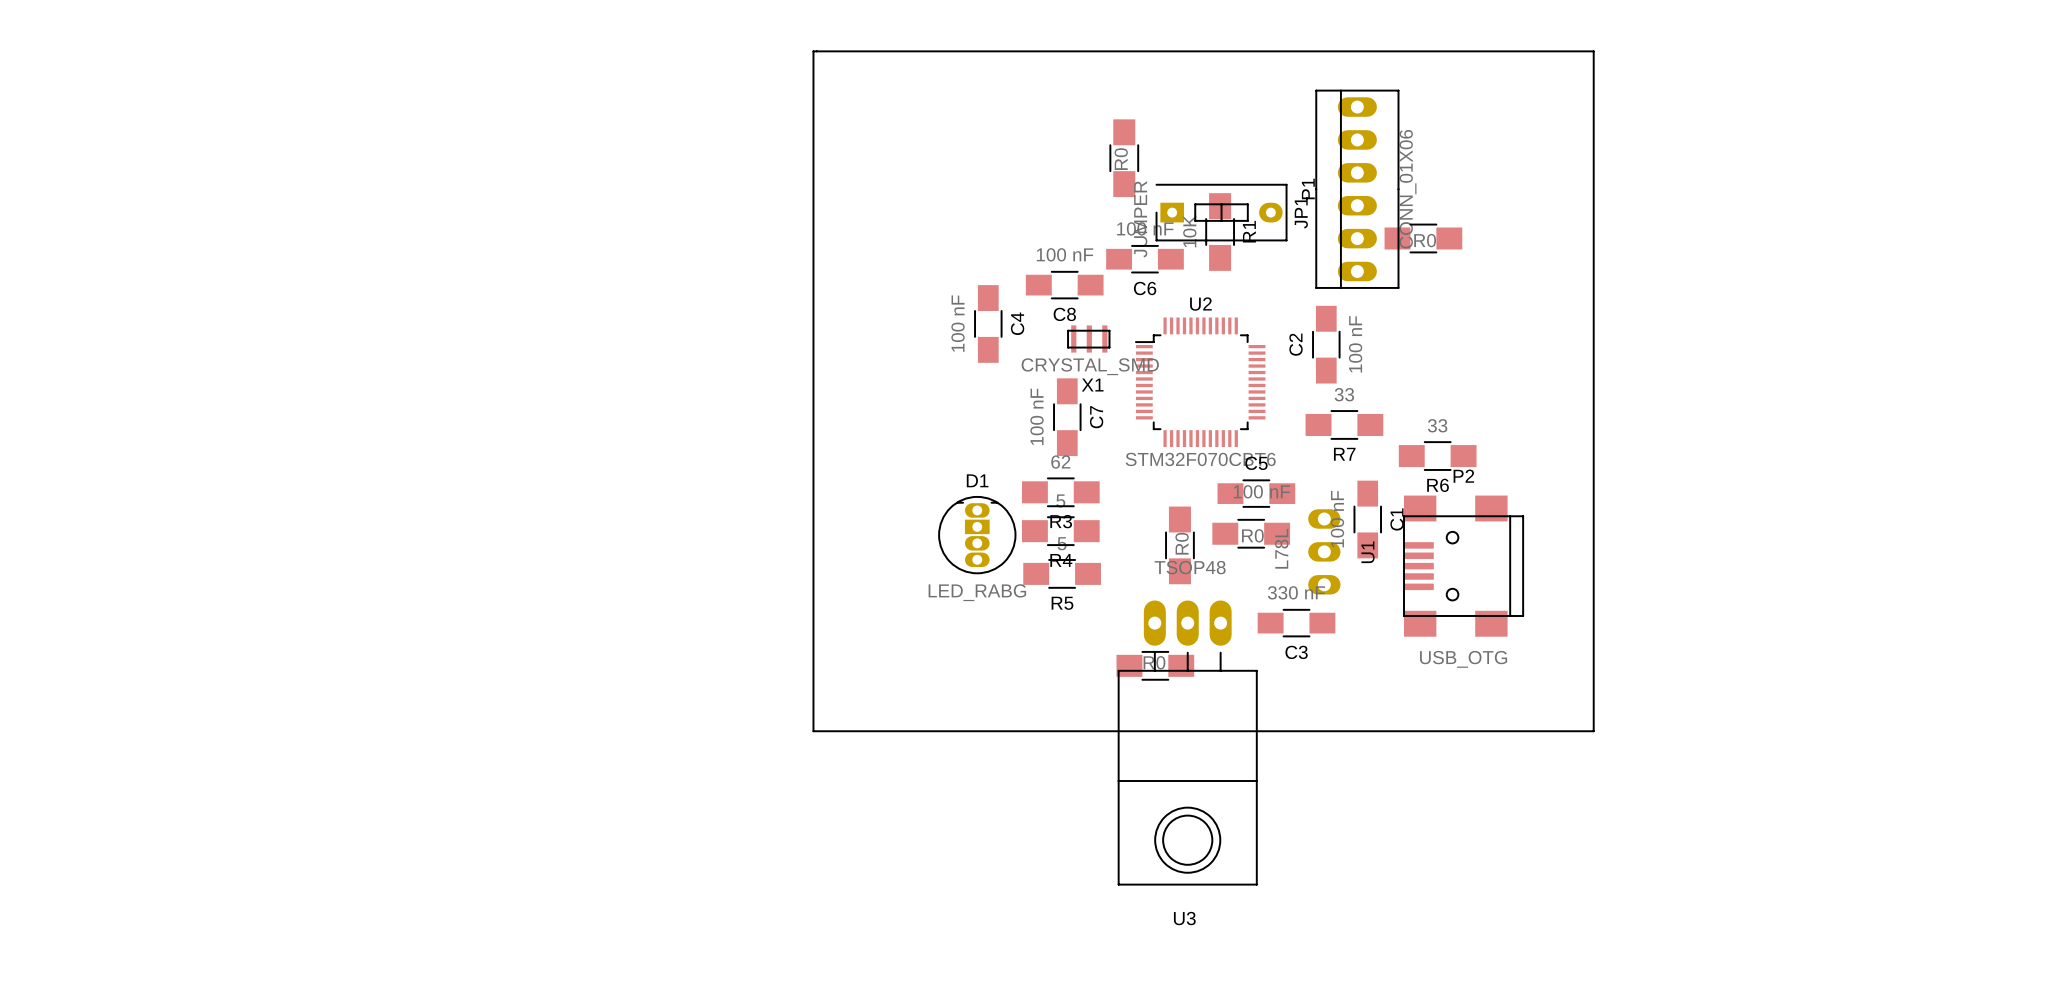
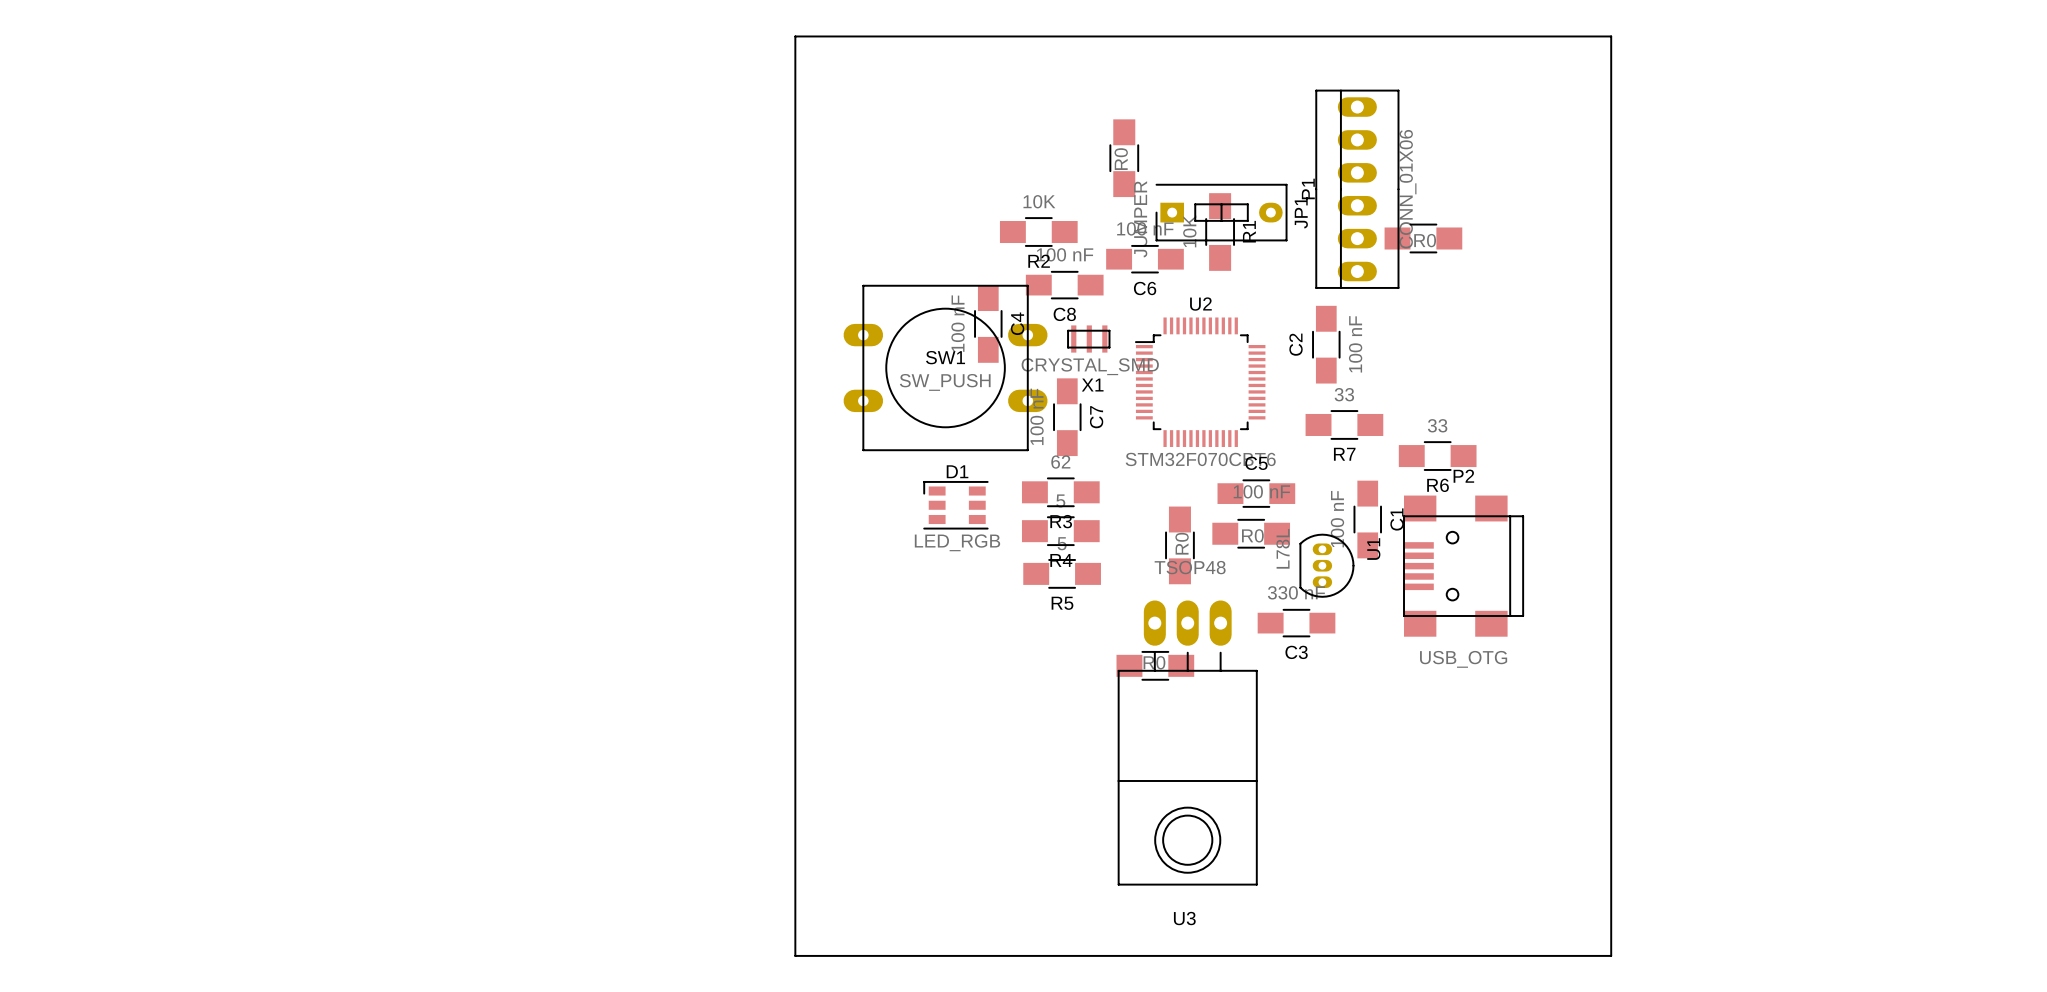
board edge: (813, 51) (1593, 51) (1593, 731) (813, 731) (813, 51) -> (795, 36) (795, 955) (1611, 955) (1611, 36) (795, 36)
R2: none -> 10K (1038, 232)
SW1: none -> SW_PUSH (945, 367)
D1 footprint: [938, 495, 1017, 575] -> [923, 480, 989, 530]
U1 footprint: [1308, 509, 1341, 595] -> [1299, 533, 1355, 598]
D1 value: LED_RABG (977, 592) -> LED_RGB (957, 542)

